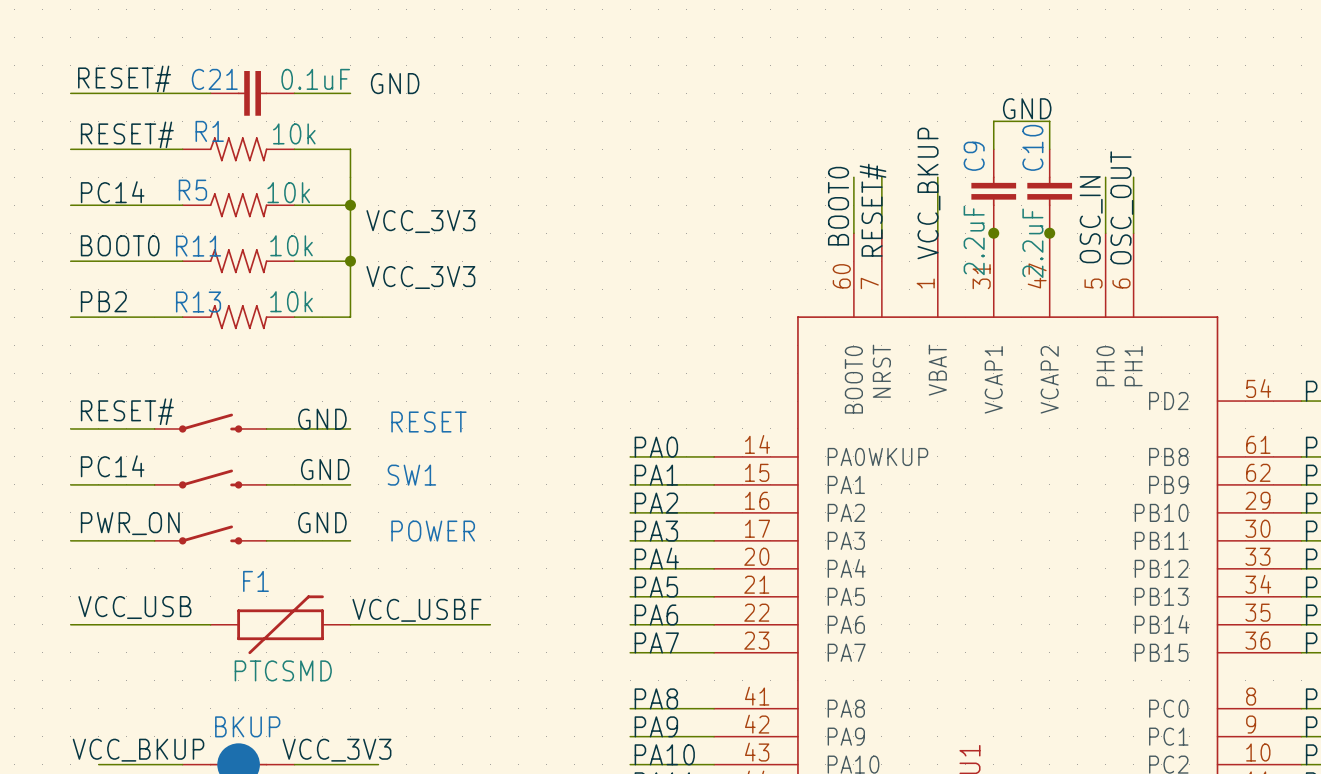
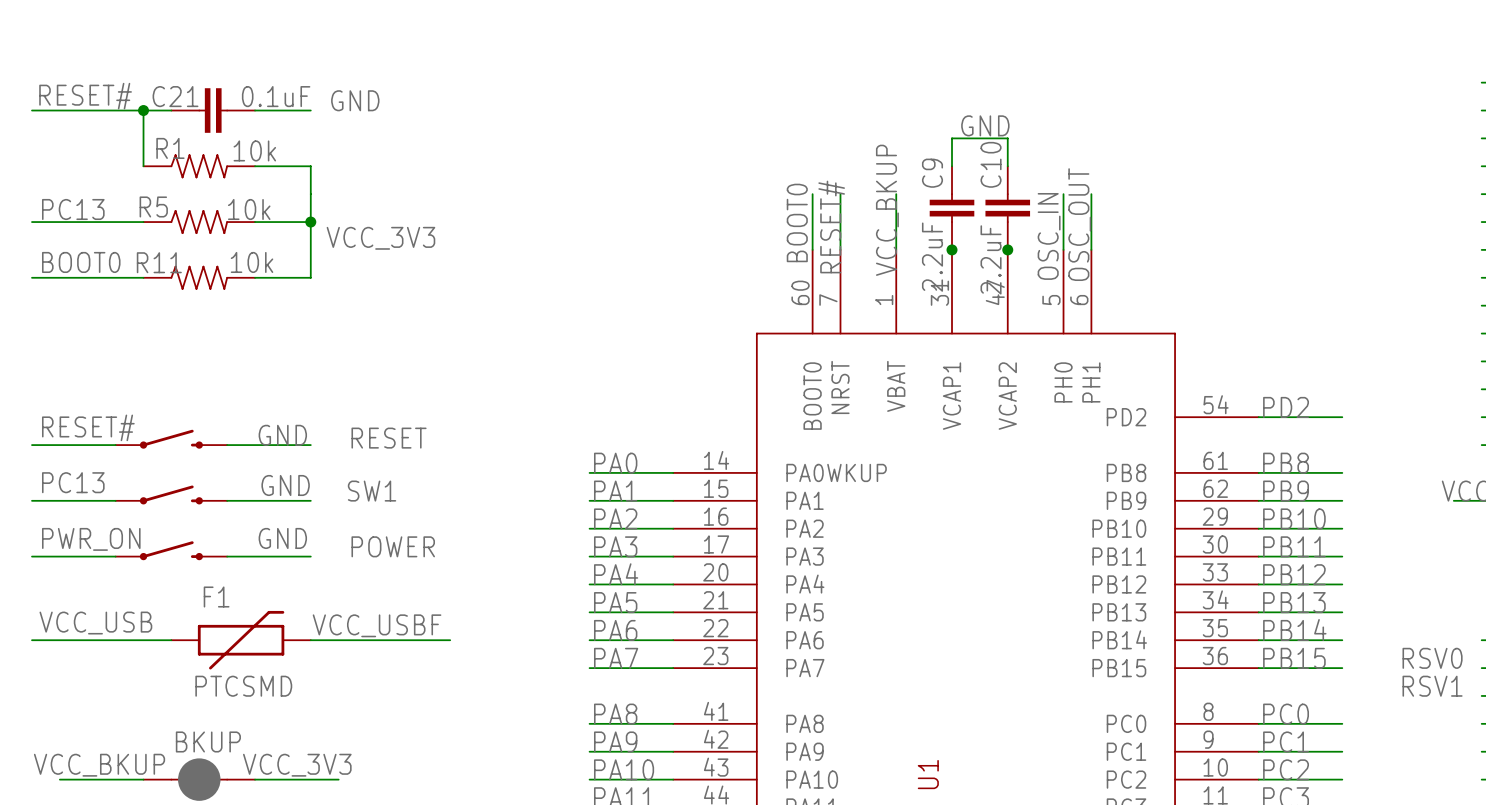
junction: none -> (143, 110)
label: RESET# (127, 134) -> none
wire: (70, 149) (182, 149) -> (143, 110) (143, 166)
label: PC14 (112, 192) -> PC13 (73, 209)
wire: (350, 261) (350, 317) (294, 317) -> none
junction: (350, 261) -> none
label: VCC_3V3 (420, 277) -> none
label: PB2 (103, 301) -> none
wire: (70, 317) (182, 317) -> none
R13: 10k (238, 317) -> none
label: PC14 (112, 466) -> PC13 (73, 482)

